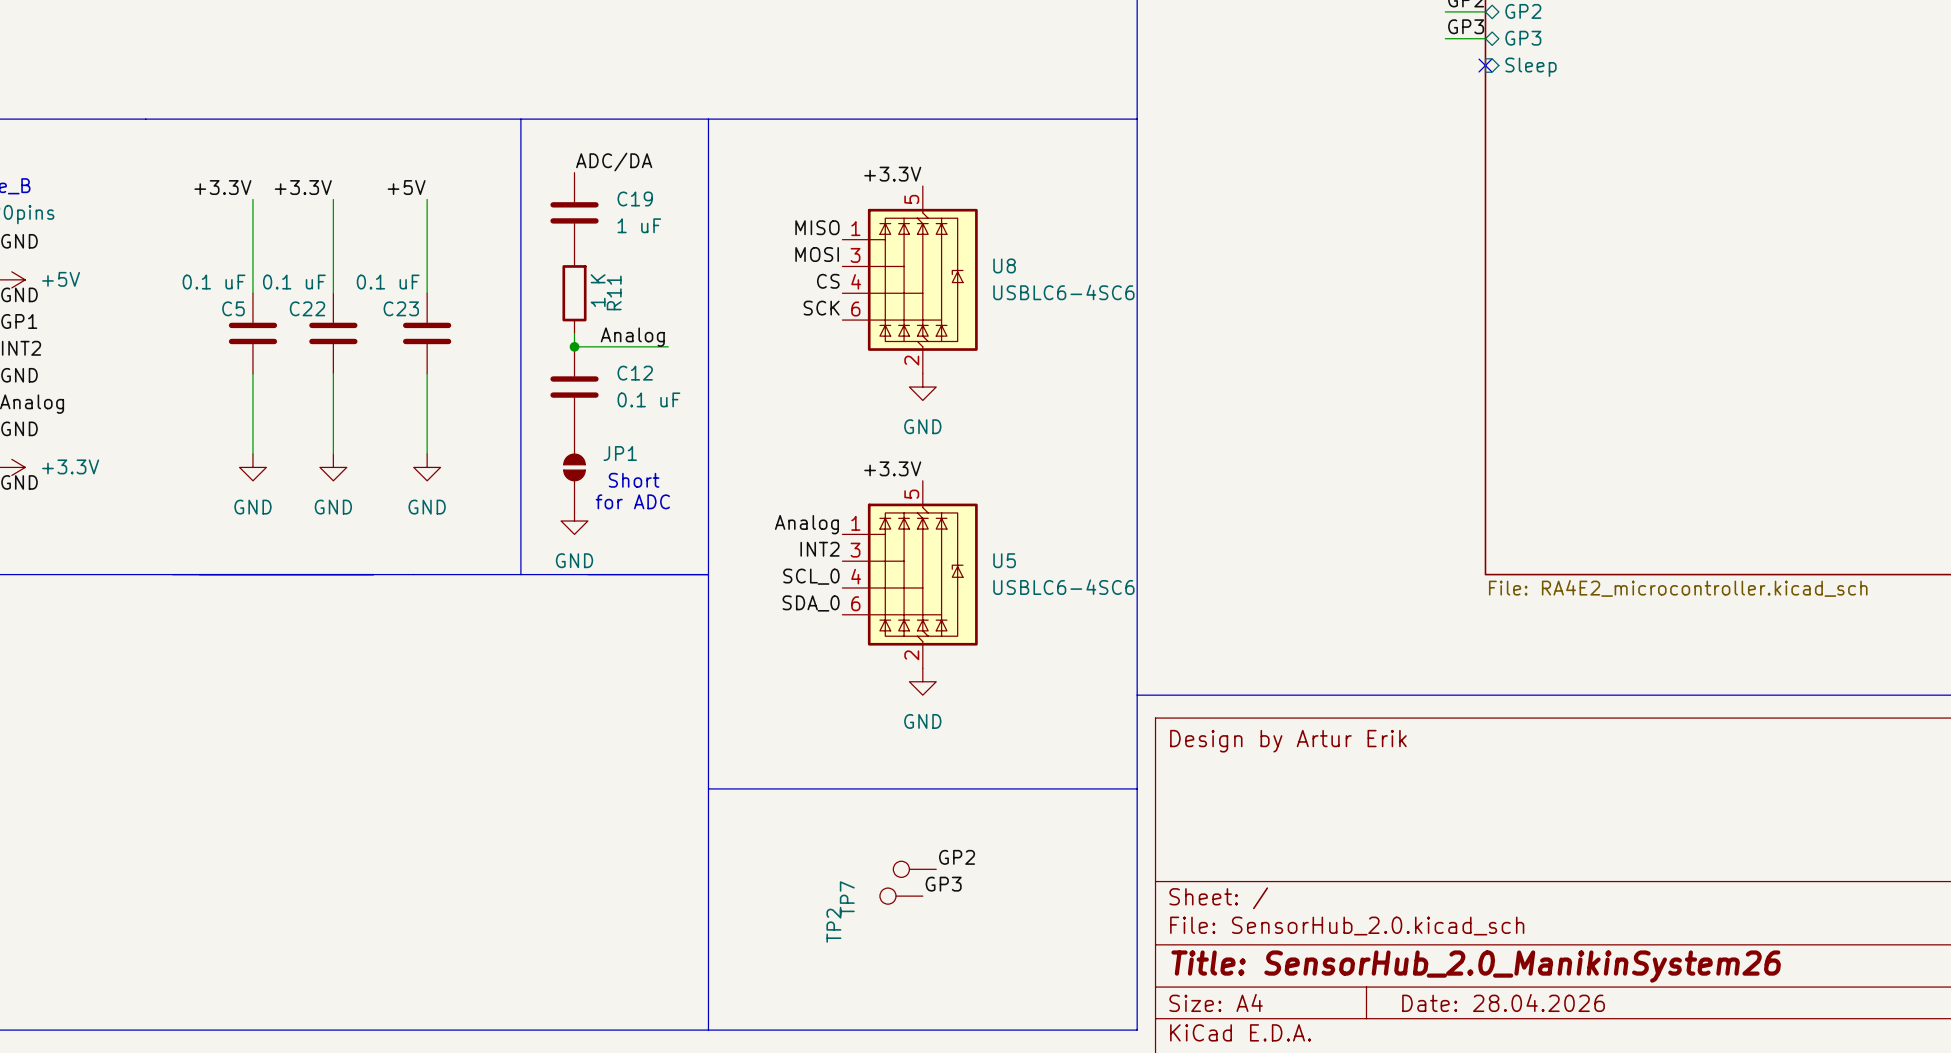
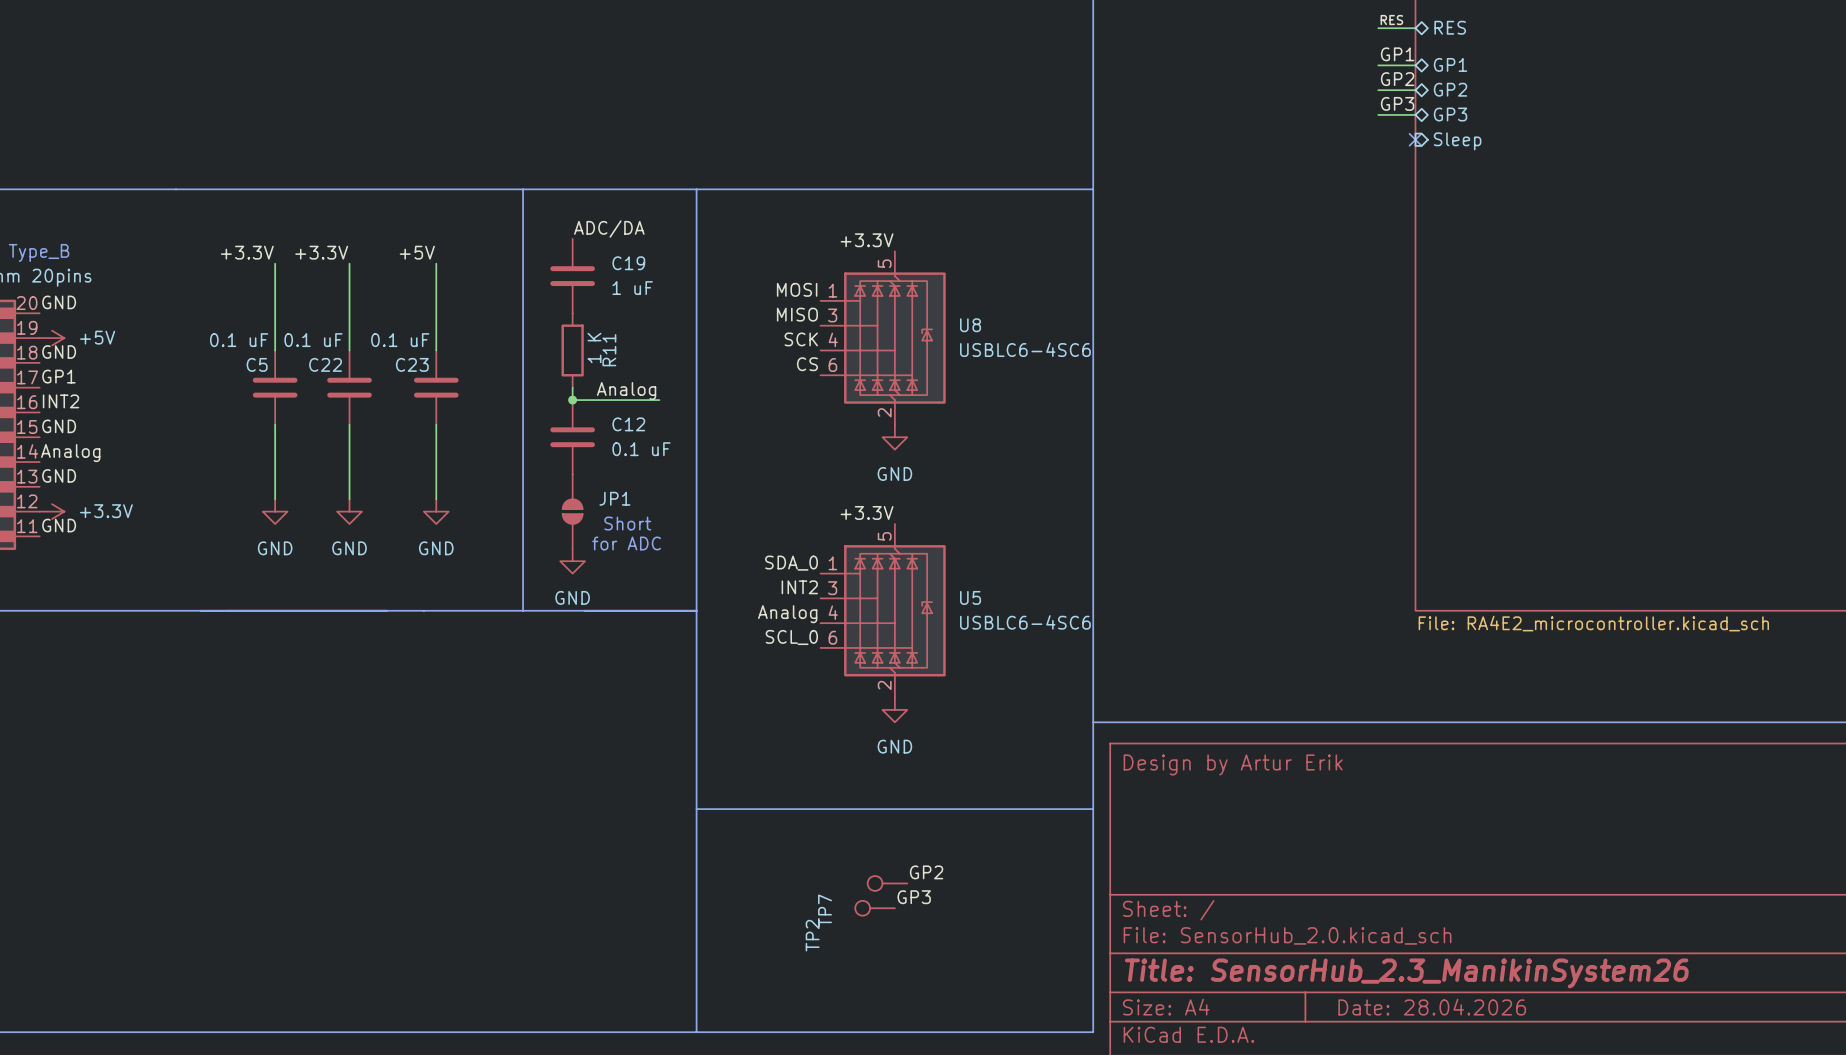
label: MISO (817, 227) -> MOSI (797, 289)
label: MOSI (817, 254) -> MISO (797, 314)
label: CS (828, 281) -> SCK (801, 339)
label: SCK (821, 308) -> CS (807, 364)
label: Analog (806, 524) -> SDA_0 (791, 563)
label: SCL_0 (811, 576) -> Analog (787, 614)
label: SDA_0 (811, 603) -> SCL_0 (791, 637)
title block: Title: SensorHub_2.0_ManikinSystem26 (1476, 966) -> Title: SensorHub_2.3_ManikinSystem26 (1406, 973)

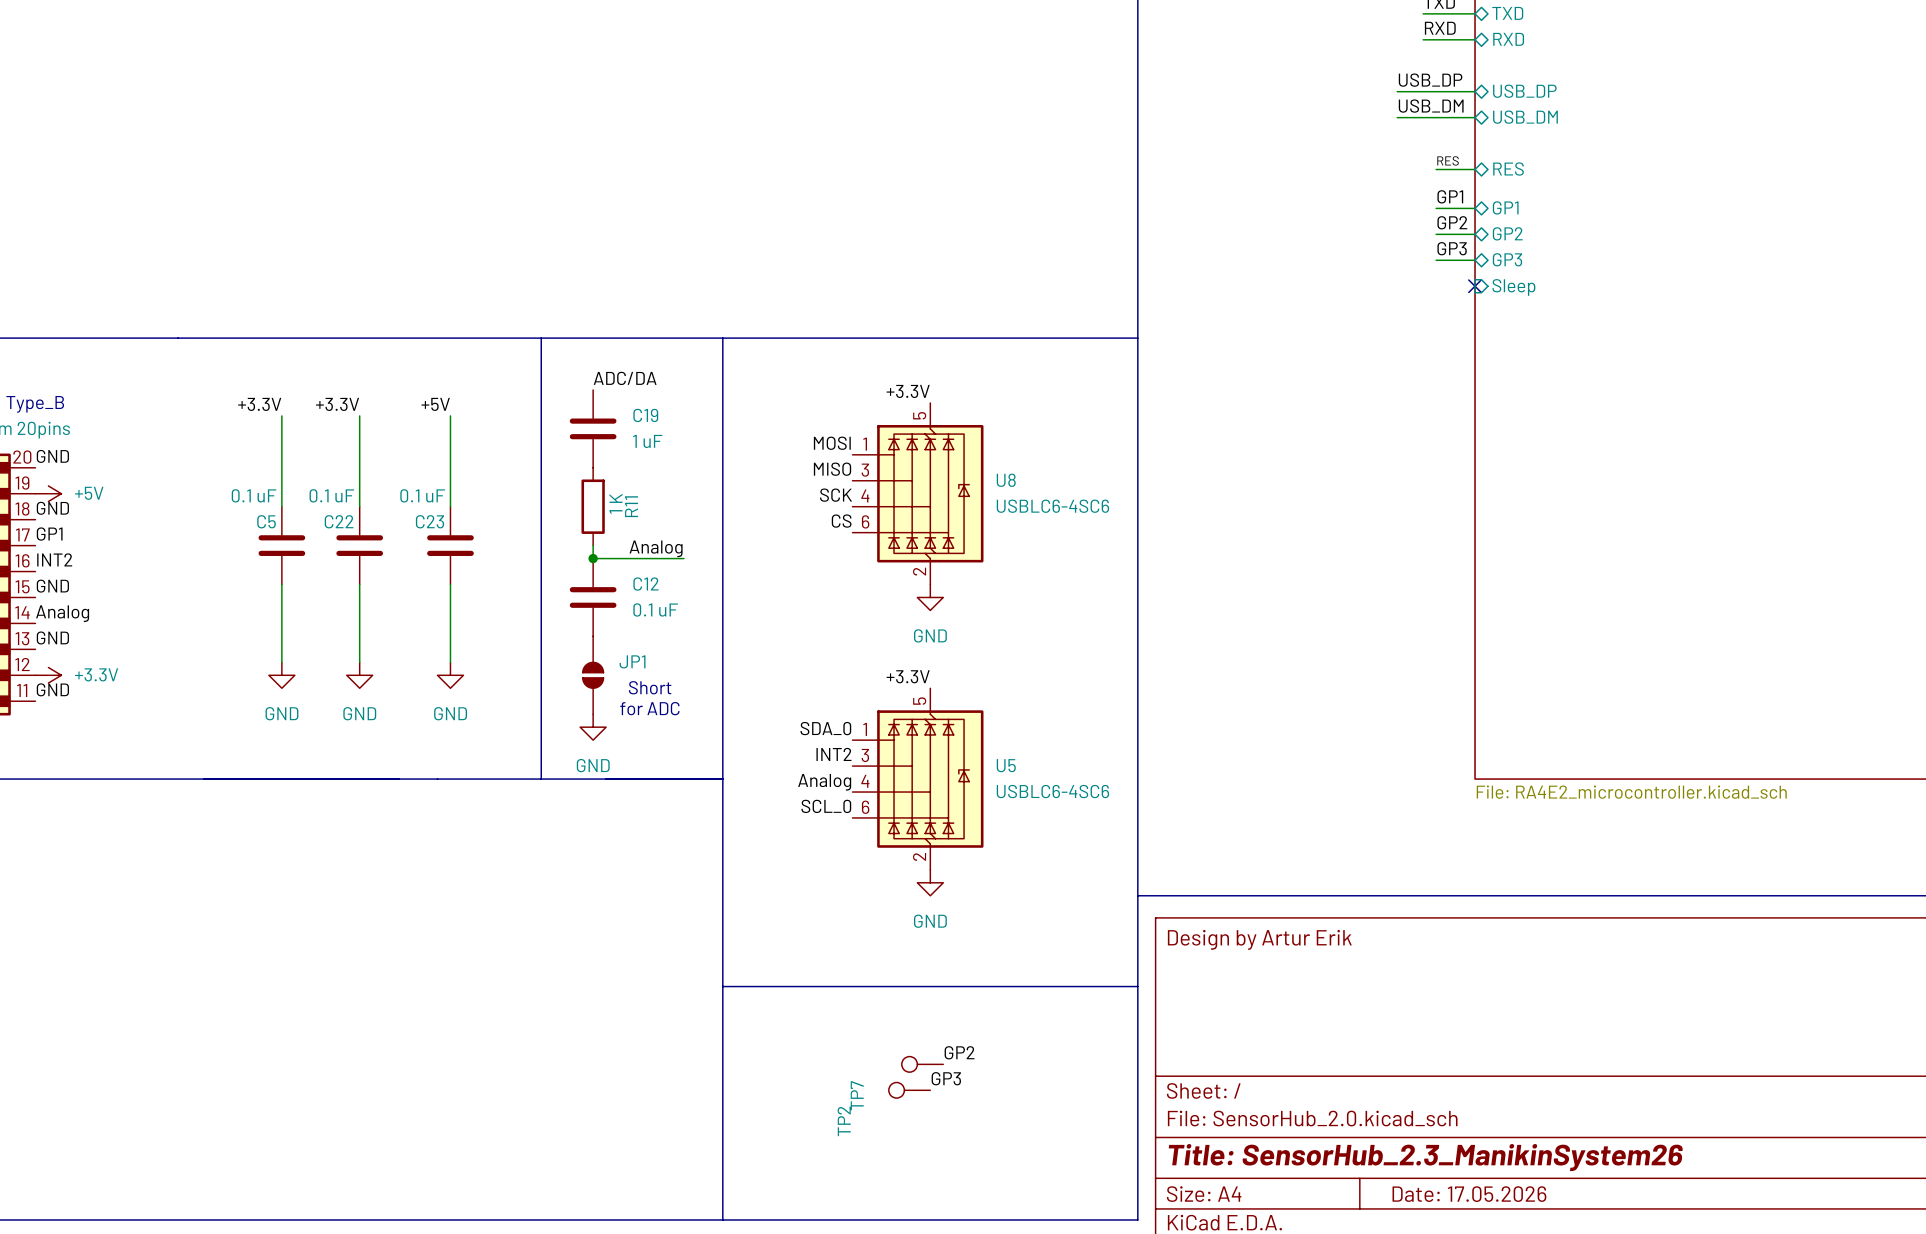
title block: Date: 28.04.2026 (1432, 1007) -> Date: 17.05.2026 (1469, 1194)

